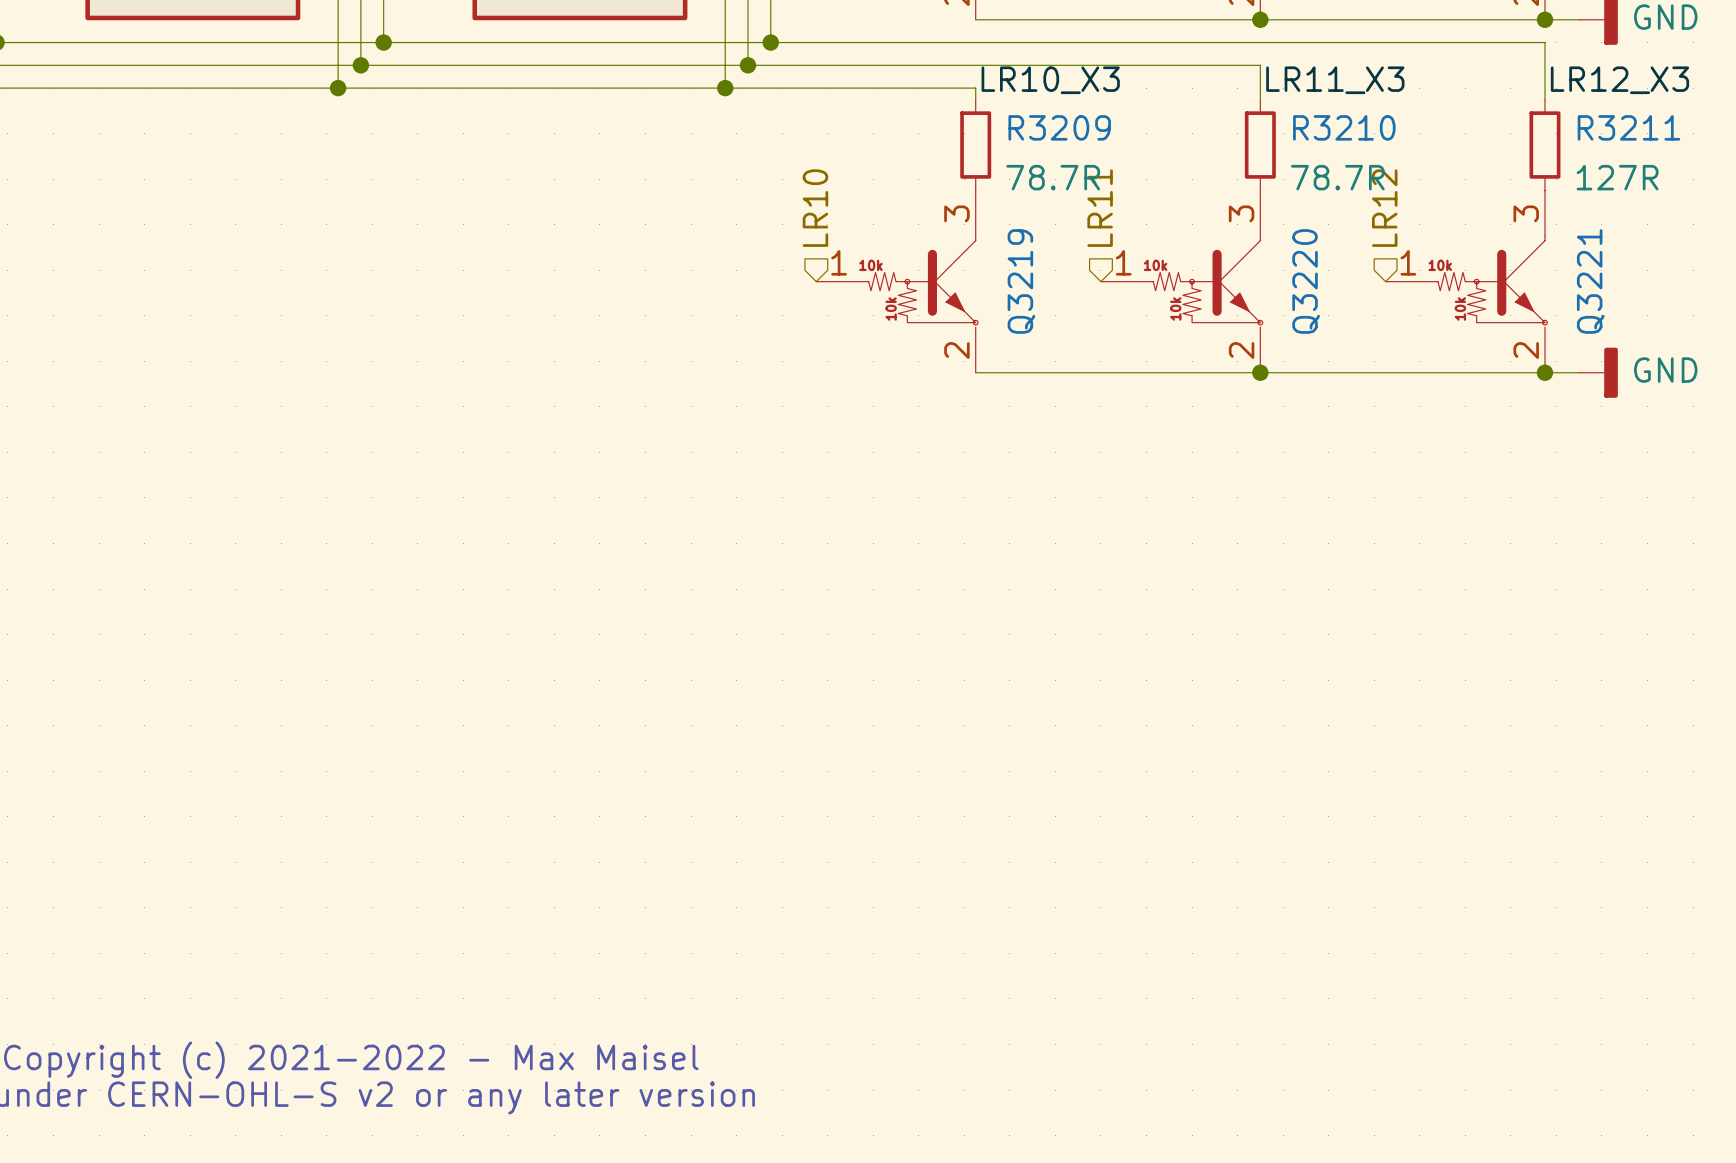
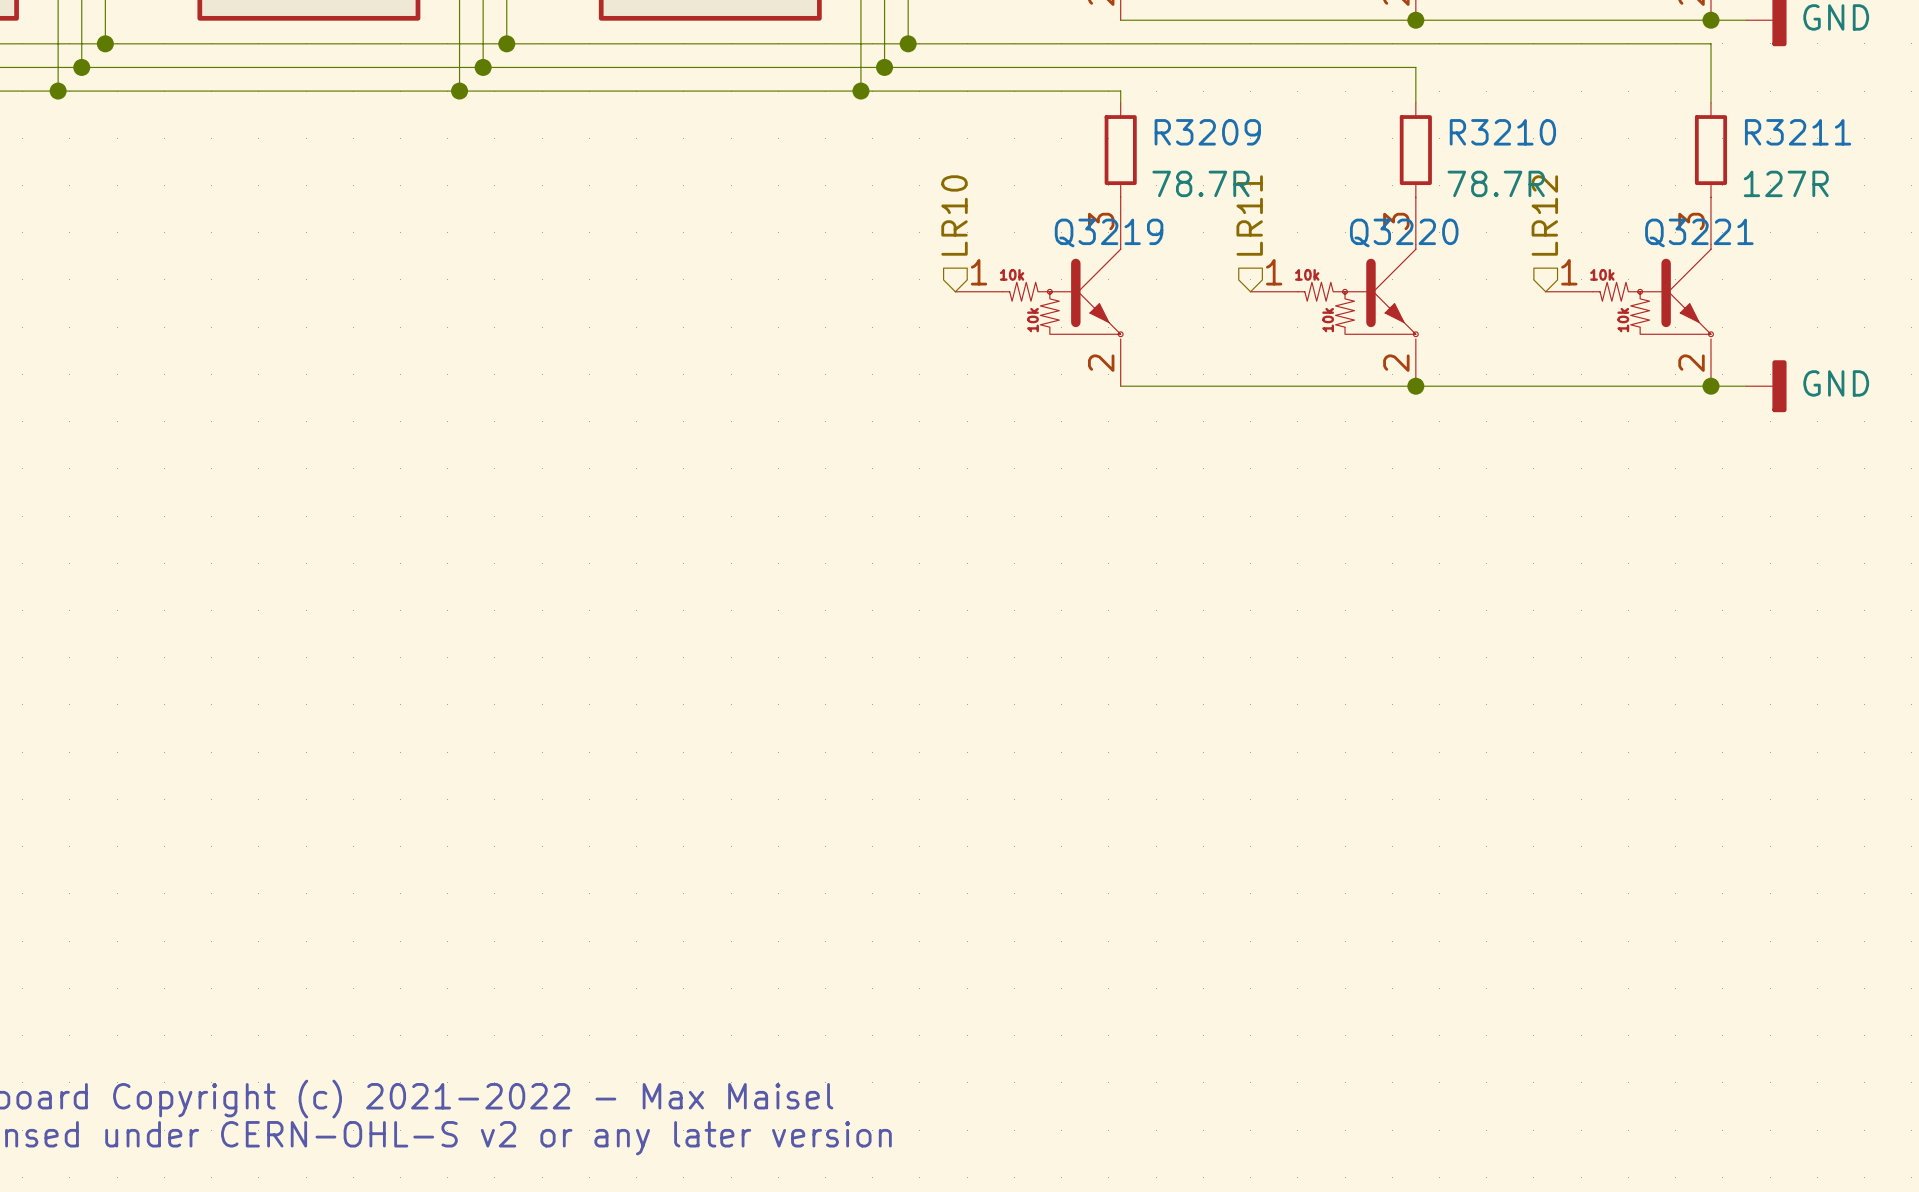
label: LR10_X3 (1050, 80) -> none
label: LR11_X3 (1335, 80) -> none
label: LR12_X3 (1619, 80) -> none
Q3219 name rotation: 0° (1021, 281) -> 90° clockwise (1109, 232)
Q3220 name rotation: 0° (1306, 281) -> 90° clockwise (1404, 232)
Q3221 name rotation: 0° (1590, 281) -> 90° clockwise (1699, 232)

